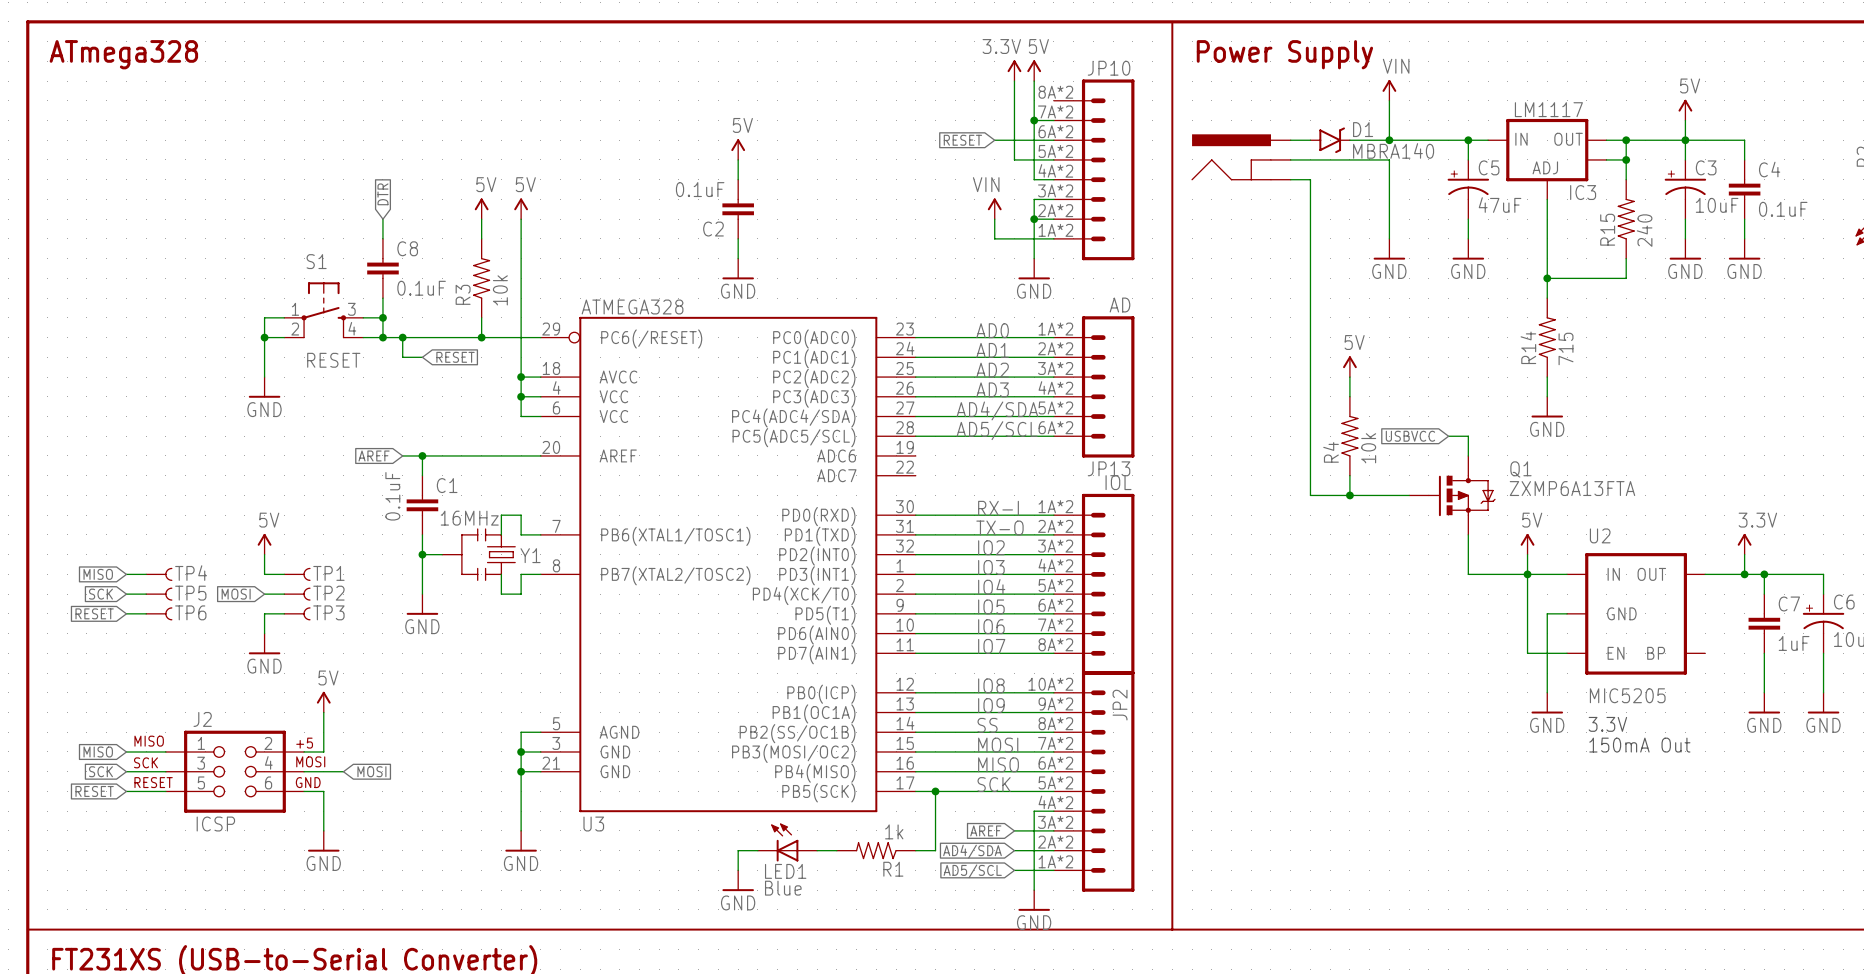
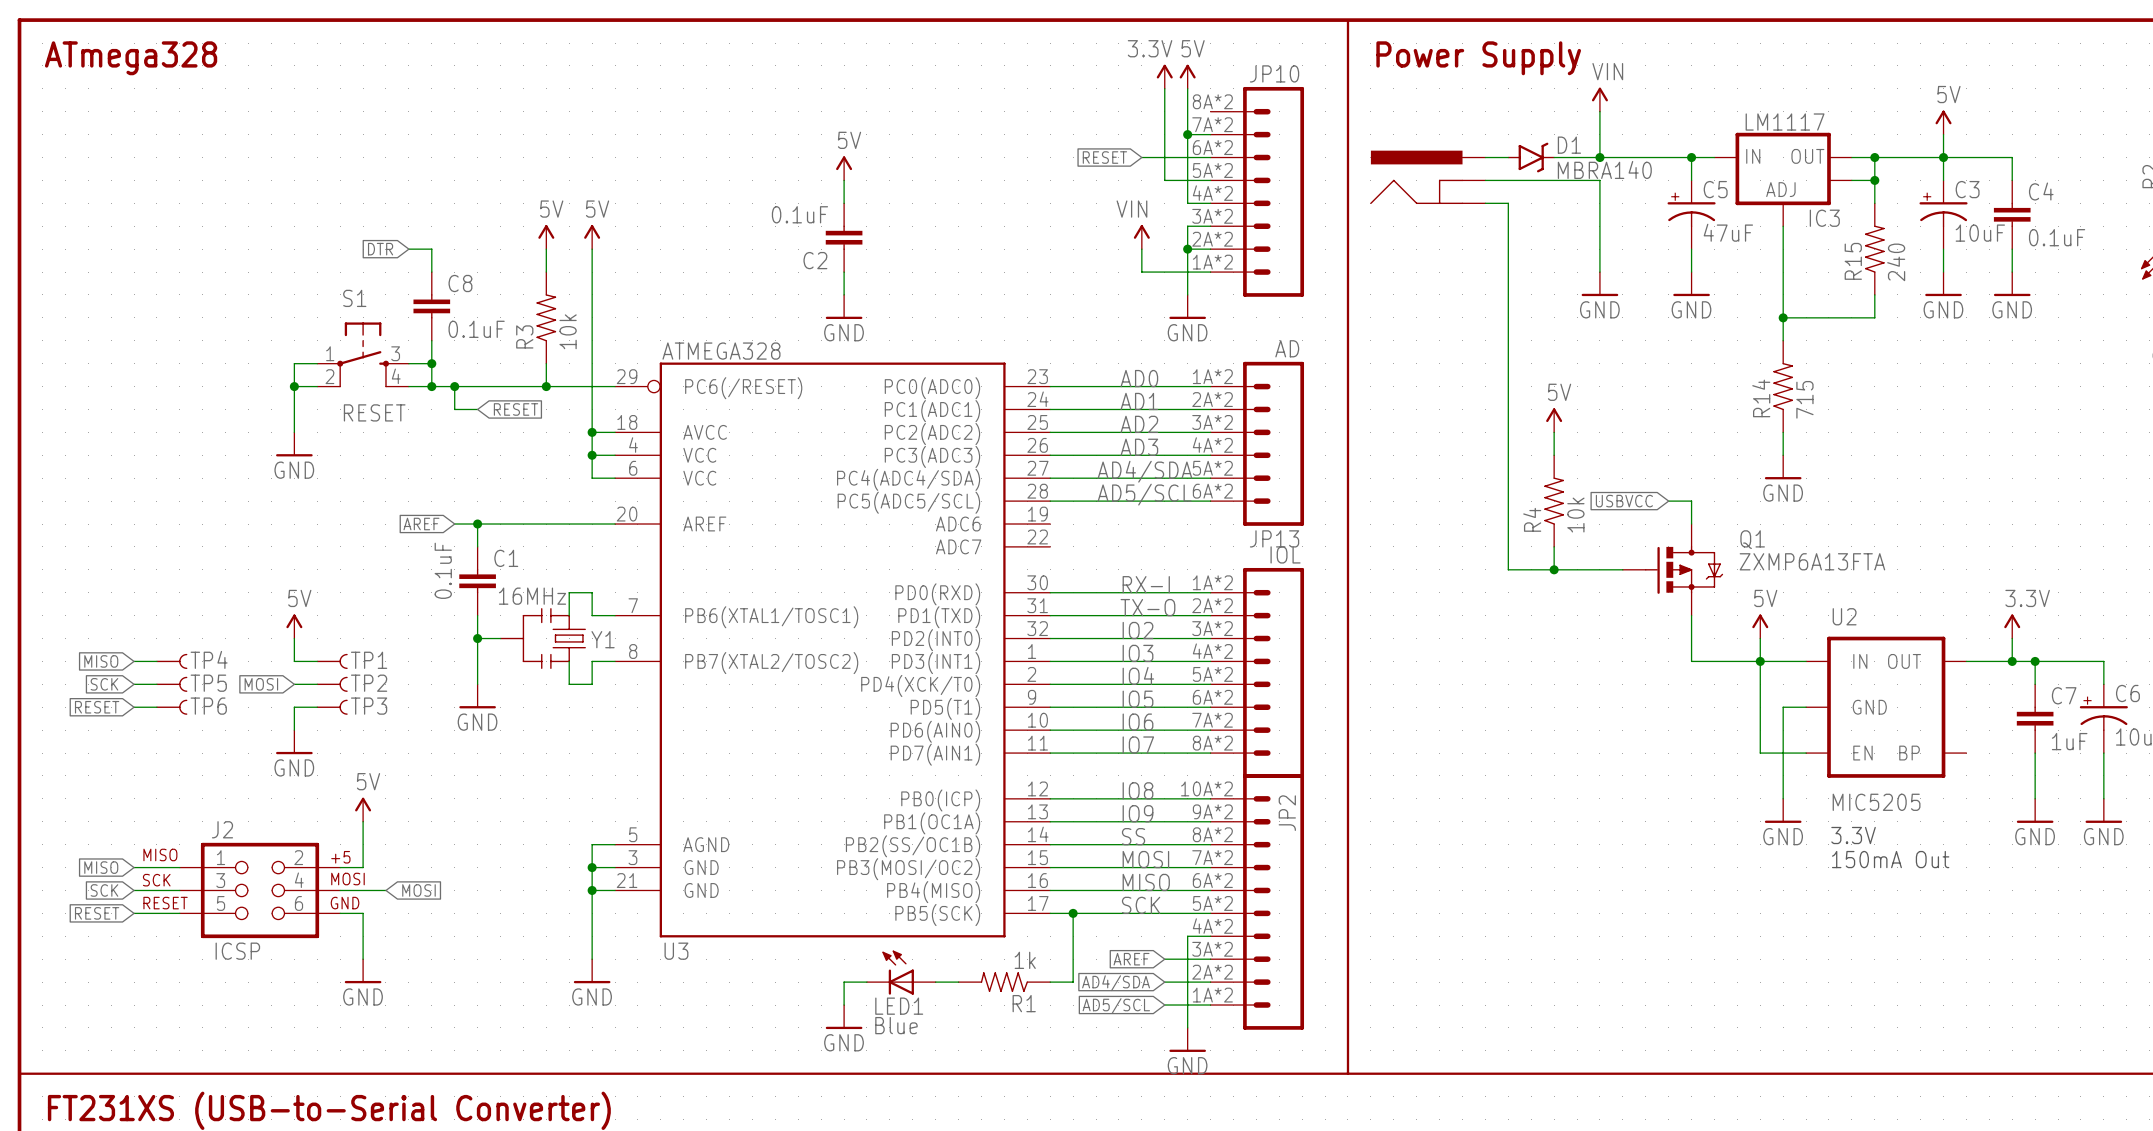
global label rotation: 0° (382, 194) -> 90° counterclockwise (380, 249)
global label position: DTR (382, 194) -> DTR (380, 249)
wire: none -> (408, 249) (431, 249)

